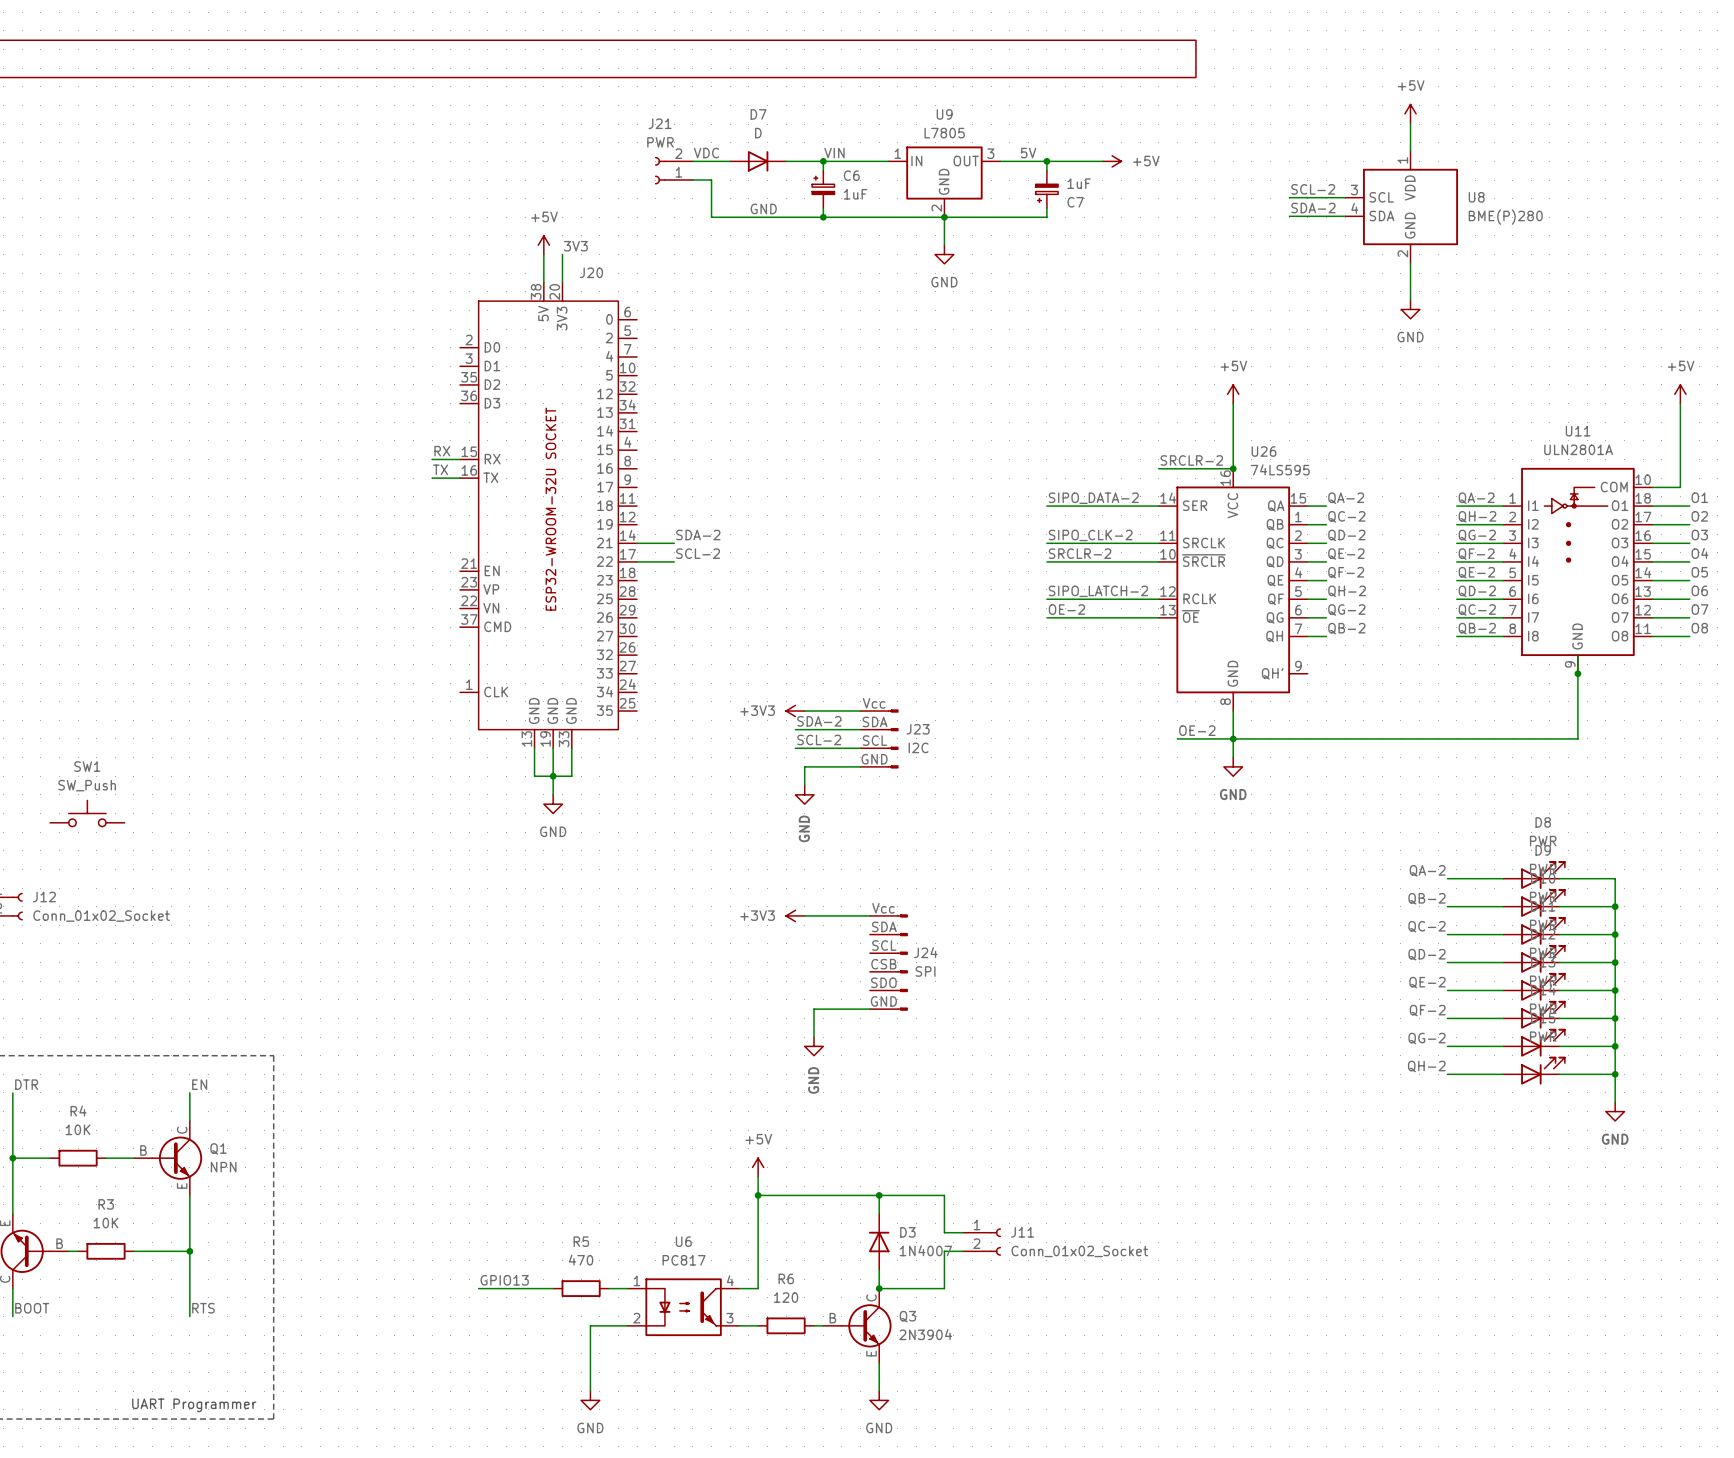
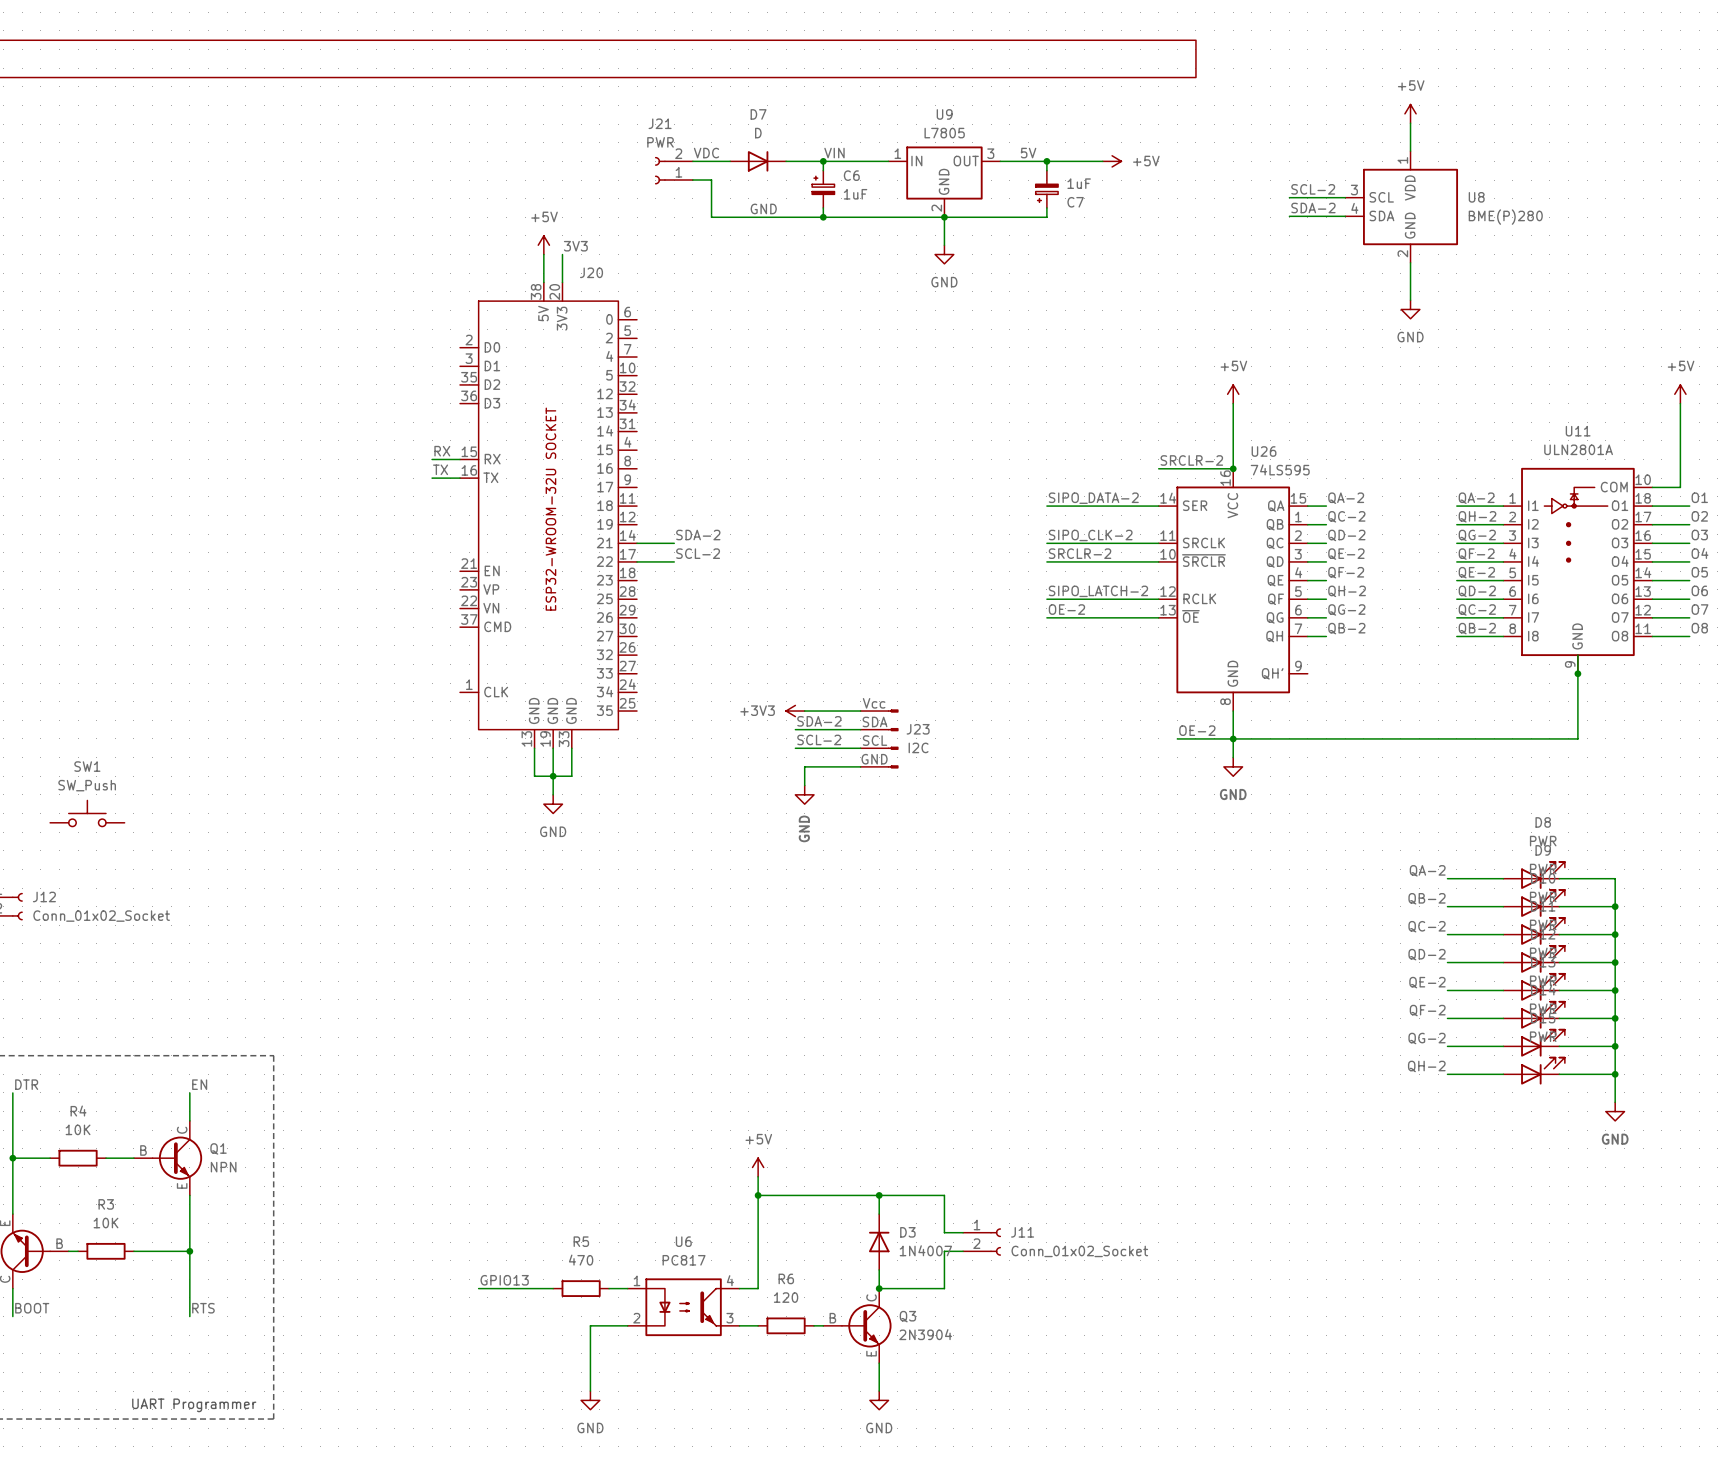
power symbol: +3V3 (795, 915) -> none
wire: (804, 915) (869, 915) -> none
J24: SPI (888, 962) -> none
wire: (869, 1009) (814, 1009) (814, 1037) -> none
power symbol: GND (814, 1046) -> none

